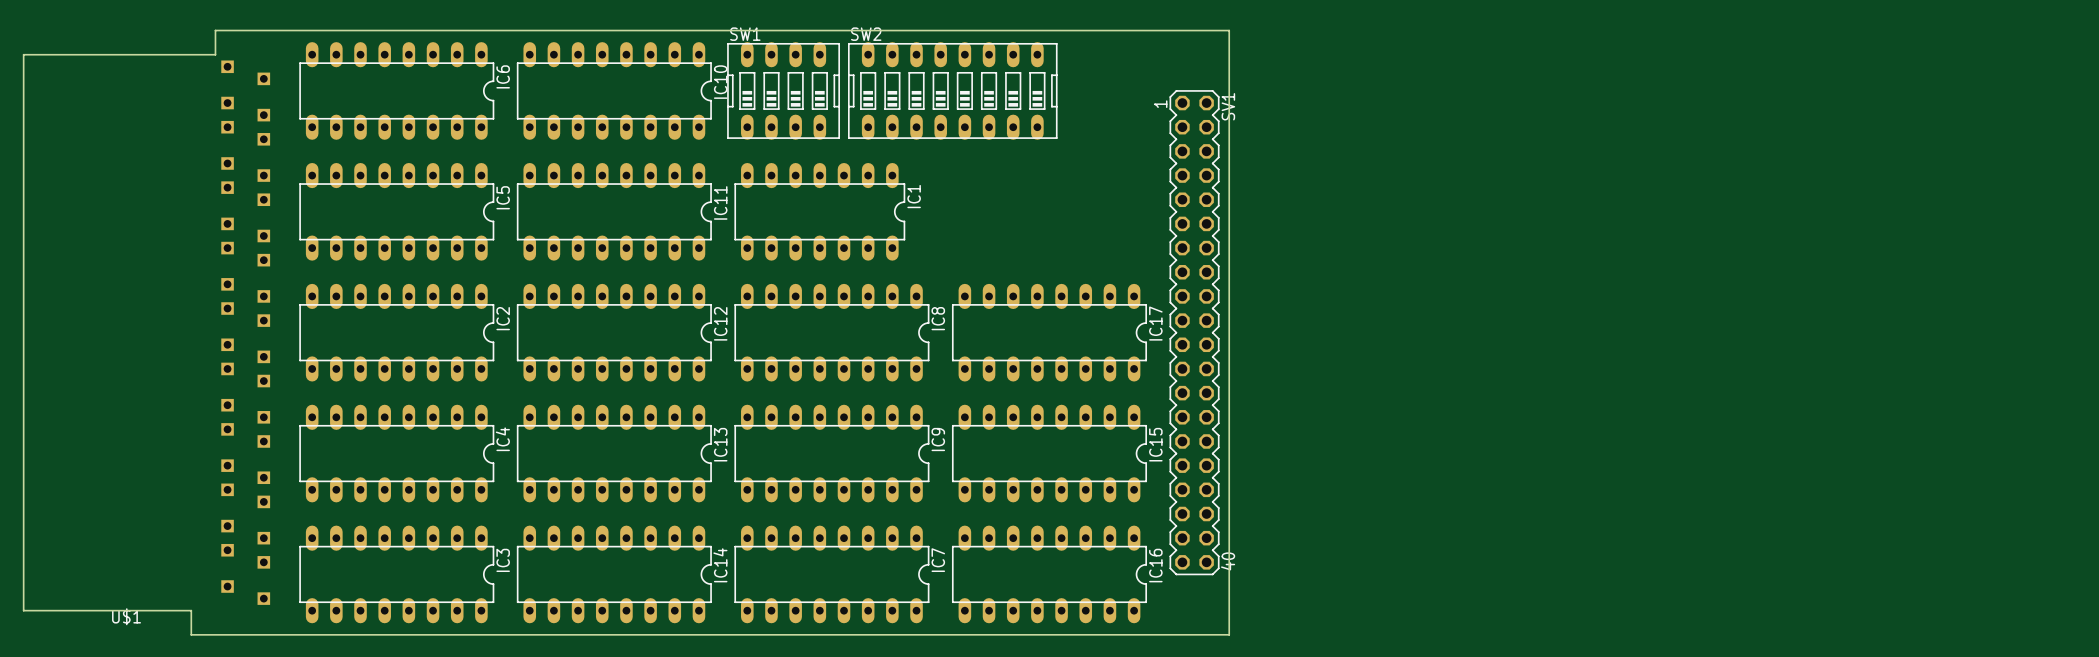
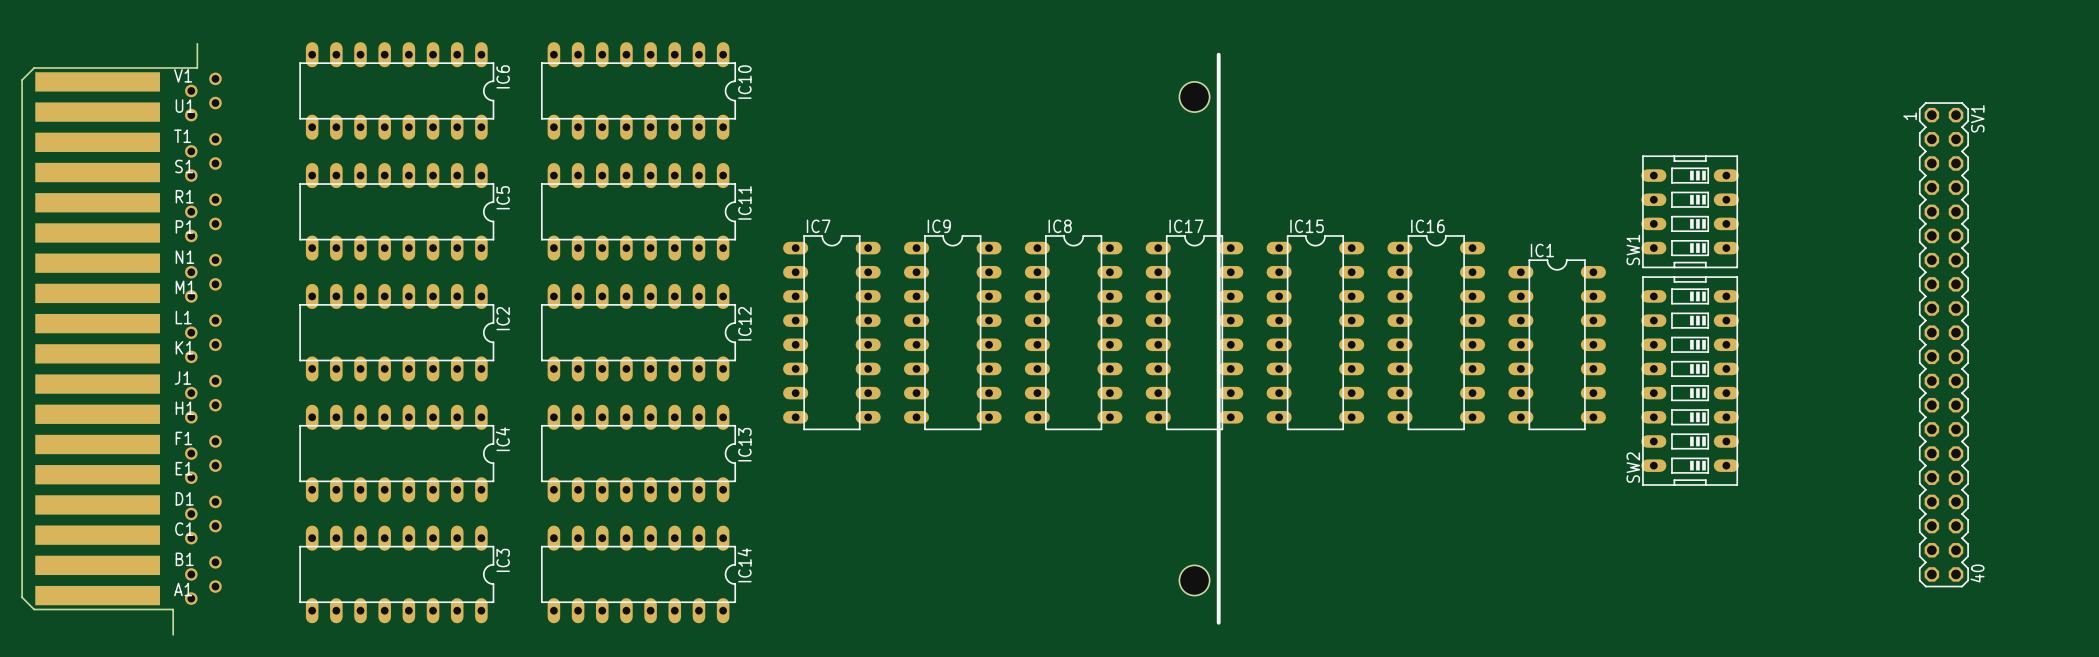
board edge: (215, 30) (1229, 30) (1229, 634) (191, 634) (191, 610) (23, 610) (23, 54) (215, 54) (215, 30) -> none
line: none -> (1218, 54) (1218, 622)
IC10 position: (614, 90) -> (638, 90)
SW1 rotation: 0° (783, 90) -> 90° counterclockwise (1690, 211)
SW1 position: (783, 90) -> (1690, 211)
SW2 rotation: 0° (952, 90) -> 90° counterclockwise (1690, 381)
SW2 position: (952, 90) -> (1690, 381)
hole: none -> (1194, 96)
IC11 position: (614, 211) -> (638, 211)
IC1 rotation: 0° (819, 211) -> 90° counterclockwise (1557, 344)
IC1 position: (819, 211) -> (1557, 344)
U$1: (245, 332) -> none
IC12 position: (614, 332) -> (638, 332)
IC8 rotation: 0° (831, 332) -> 90° counterclockwise (1073, 332)
IC8 position: (831, 332) -> (1073, 332)
IC17 rotation: 0° (1049, 332) -> 90° counterclockwise (1194, 332)
IC17 position: (1049, 332) -> (1194, 332)
SV1 position: (1194, 332) -> (1943, 344)
part: none -> (203, 338)
part: none -> (109, 339)
IC13 position: (614, 453) -> (638, 453)
IC9 rotation: 0° (831, 453) -> 90° counterclockwise (952, 332)
IC9 position: (831, 453) -> (952, 332)
IC15 rotation: 0° (1049, 453) -> 90° counterclockwise (1315, 332)
IC15 position: (1049, 453) -> (1315, 332)
IC14 position: (614, 574) -> (638, 574)
IC7 rotation: 0° (831, 574) -> 90° counterclockwise (831, 332)
IC7 position: (831, 574) -> (831, 332)
IC16 rotation: 0° (1049, 574) -> 90° counterclockwise (1436, 332)
IC16 position: (1049, 574) -> (1436, 332)
hole: none -> (1194, 580)

